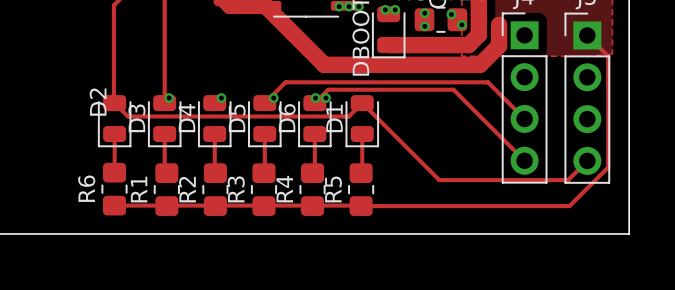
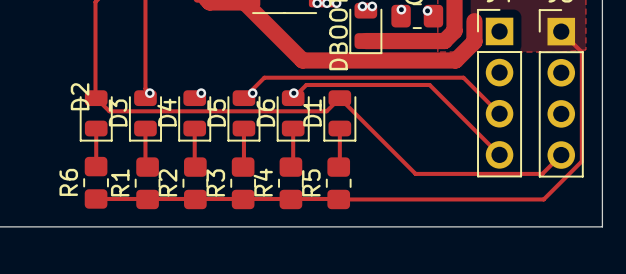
via: (461, 24) -> none
via: (424, 26) -> none
via: (325, 98) -> none

